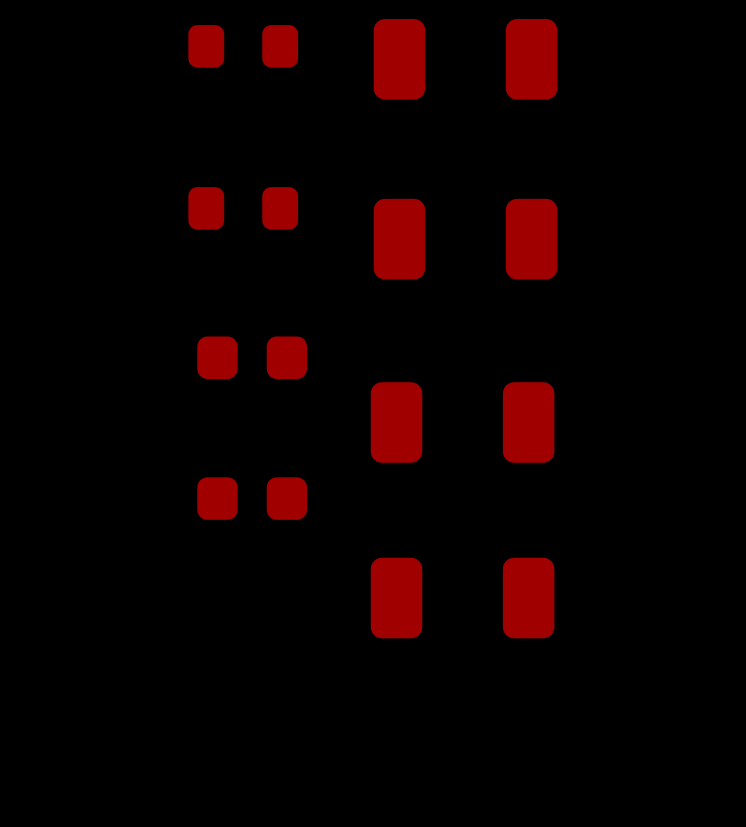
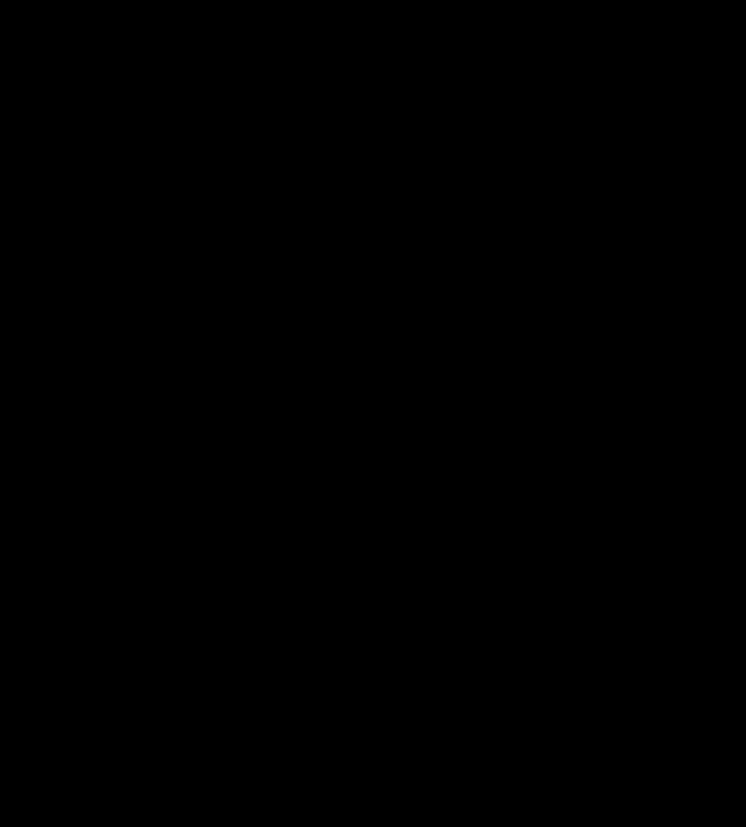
part: (243, 46) -> none
part: (465, 59) -> none
part: (243, 208) -> none
part: (465, 239) -> none
part: (252, 357) -> none
part: (462, 422) -> none
part: (252, 498) -> none
part: (462, 598) -> none

